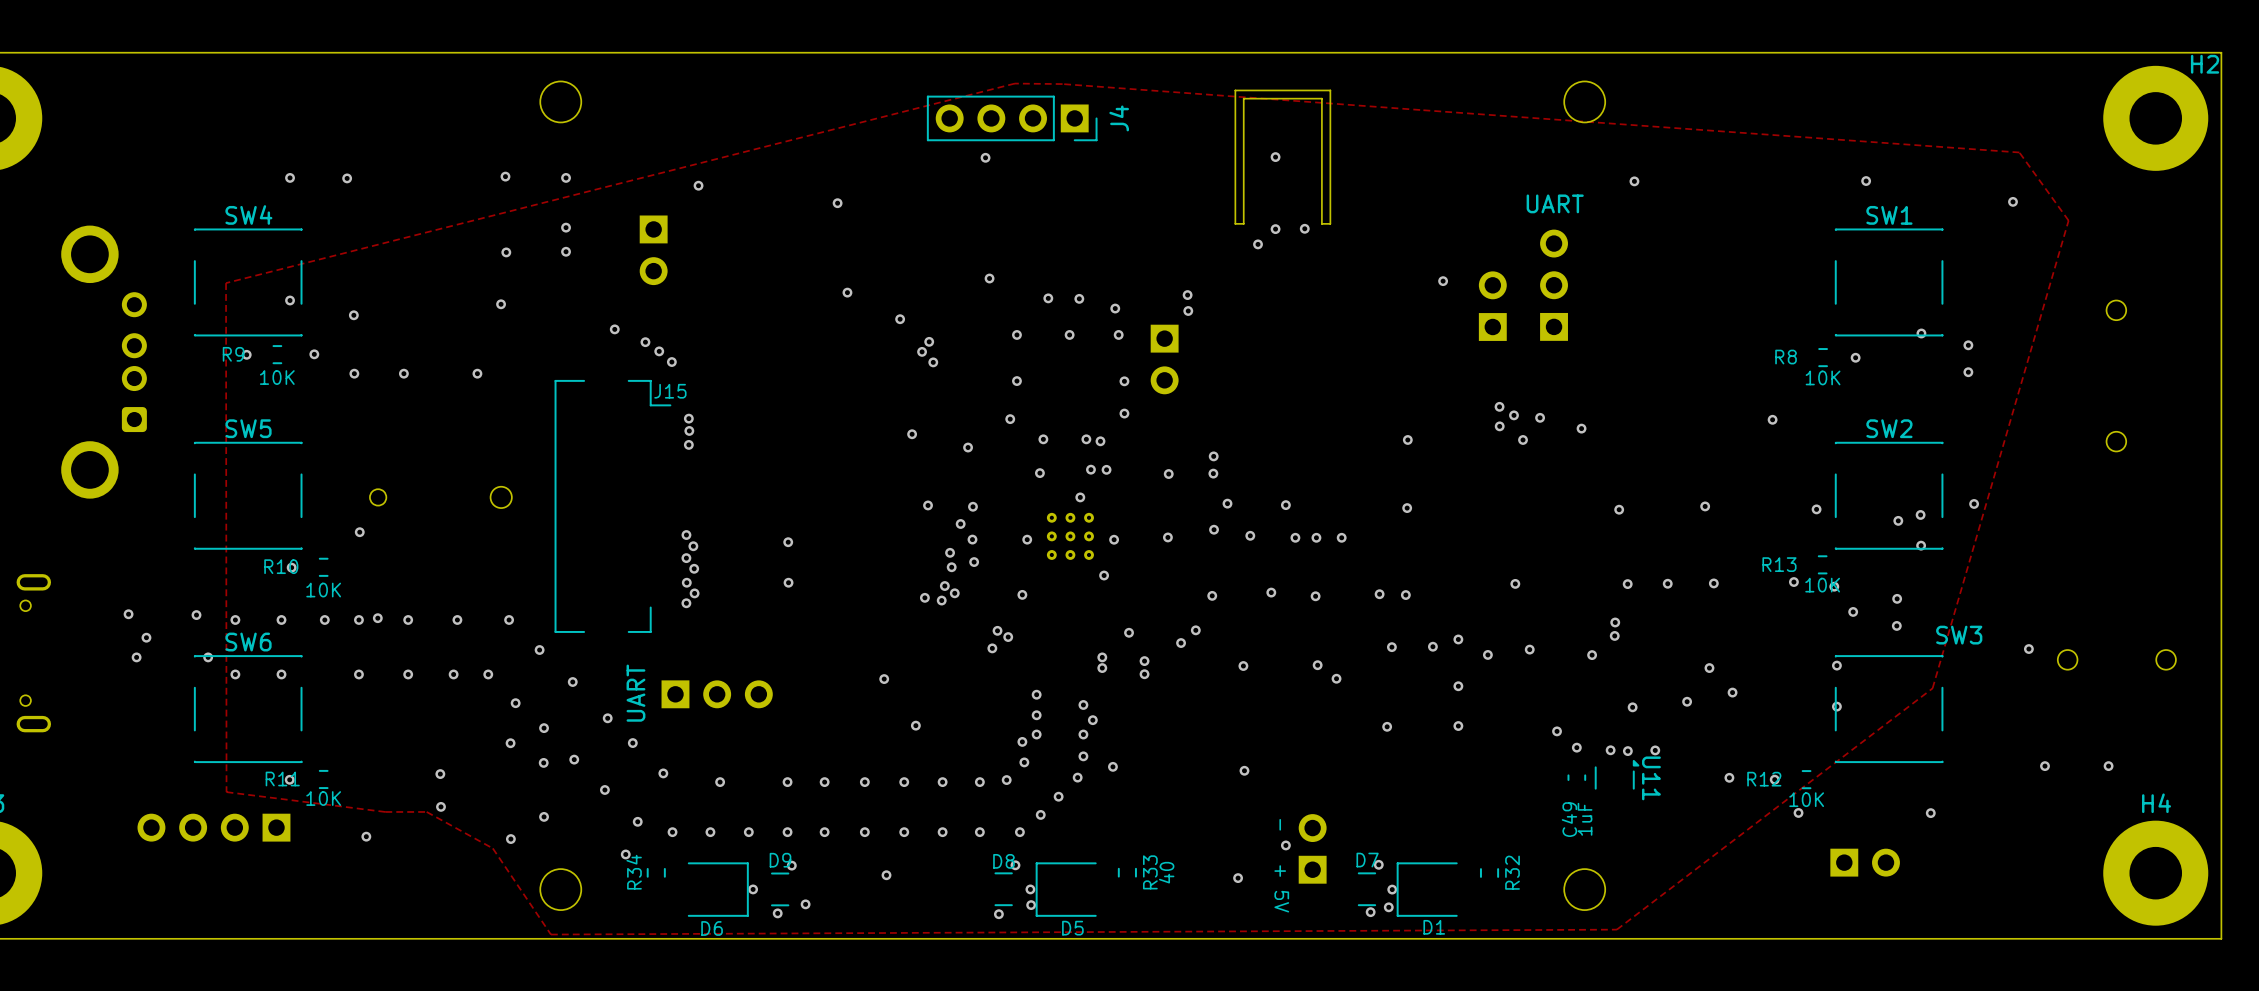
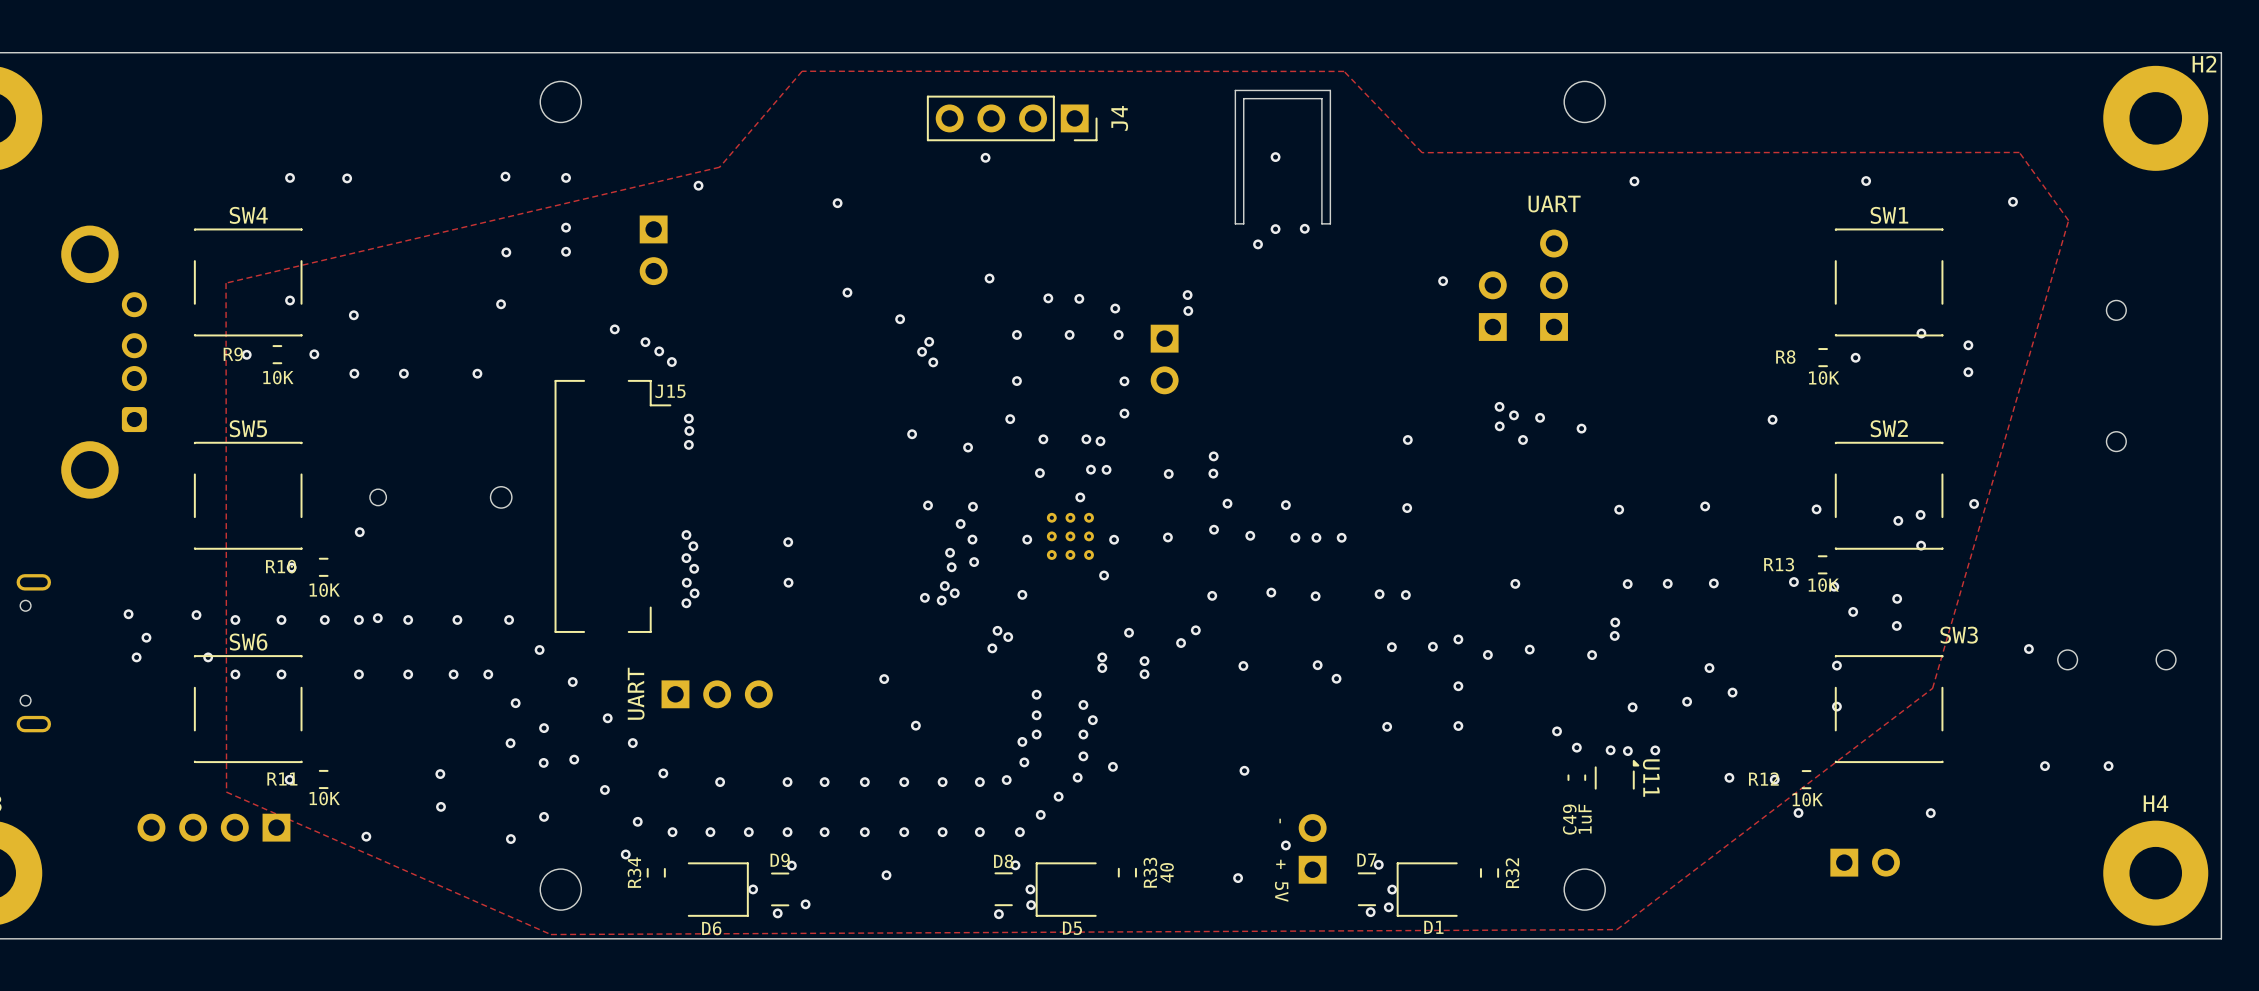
zone outline: (2019, 152) (1062, 84) (1014, 83) (226, 283) -> (2019, 152) (1422, 152) (1344, 71) (802, 71) (719, 167) (226, 283)
zone outline: (226, 792) (385, 811) (426, 811) (492, 848) (550, 934) -> (226, 792) (550, 934)

